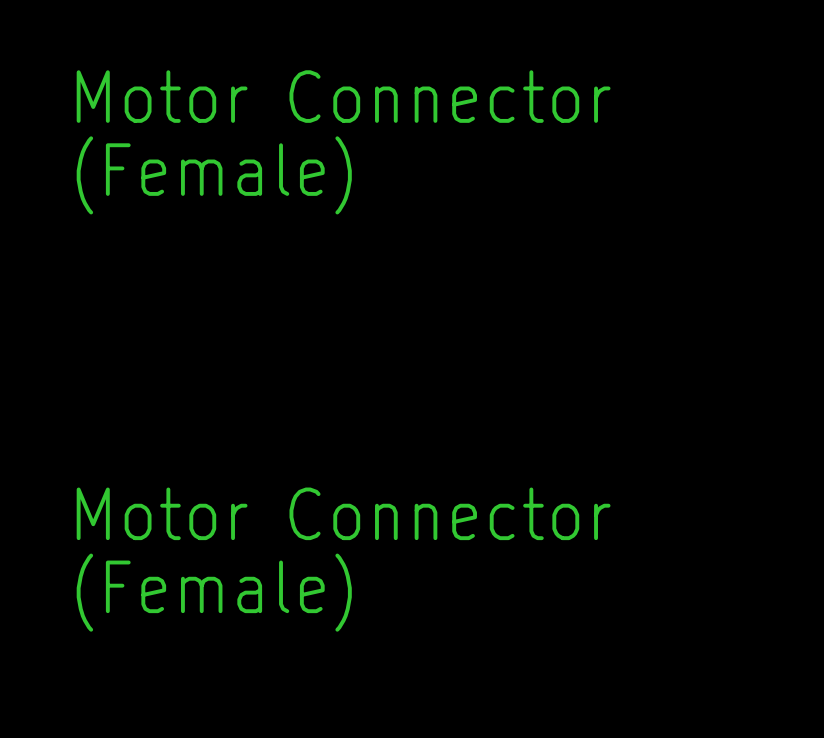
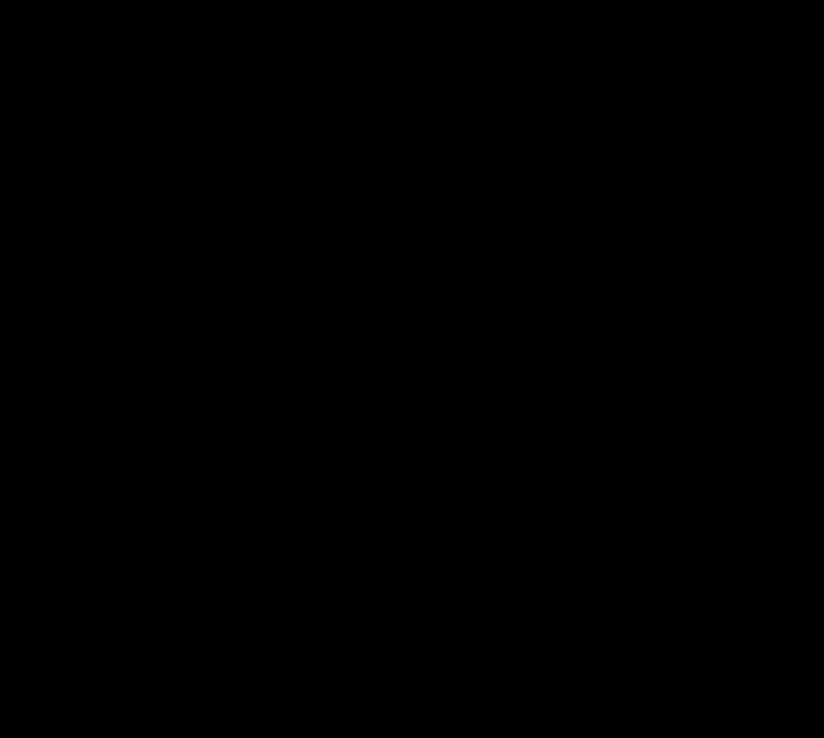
text: Motor Connector (343, 96) -> none
text: (Female) (214, 175) -> none
text: Motor Connector (343, 513) -> none
text: (Female) (214, 592) -> none

